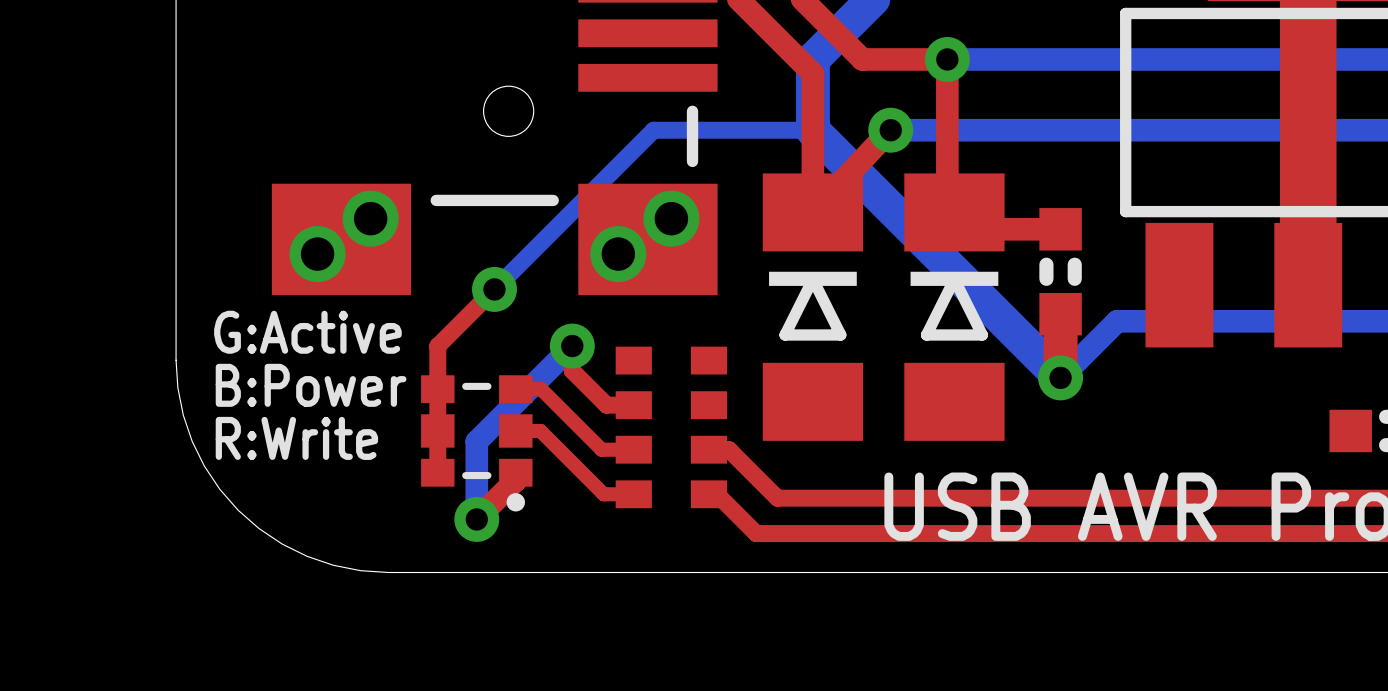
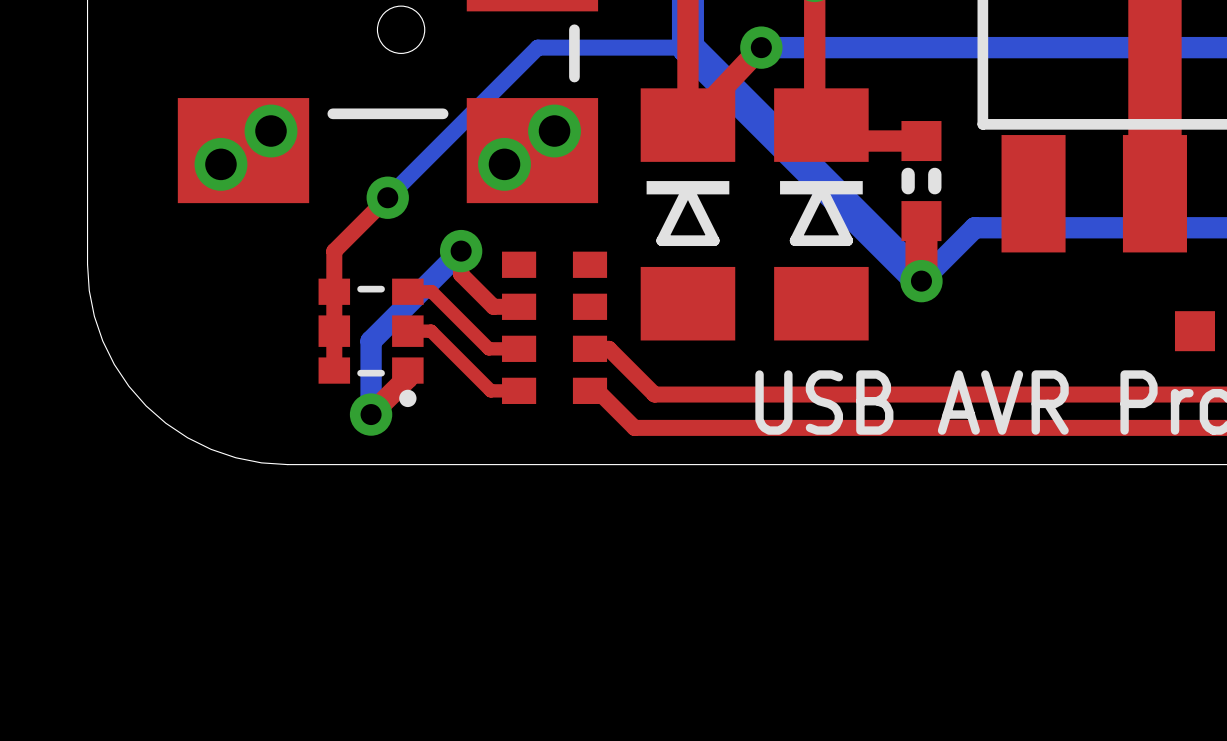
text: G:Active (307, 332) -> none
text: B:Power (311, 385) -> none
text: R:Write (296, 438) -> none

